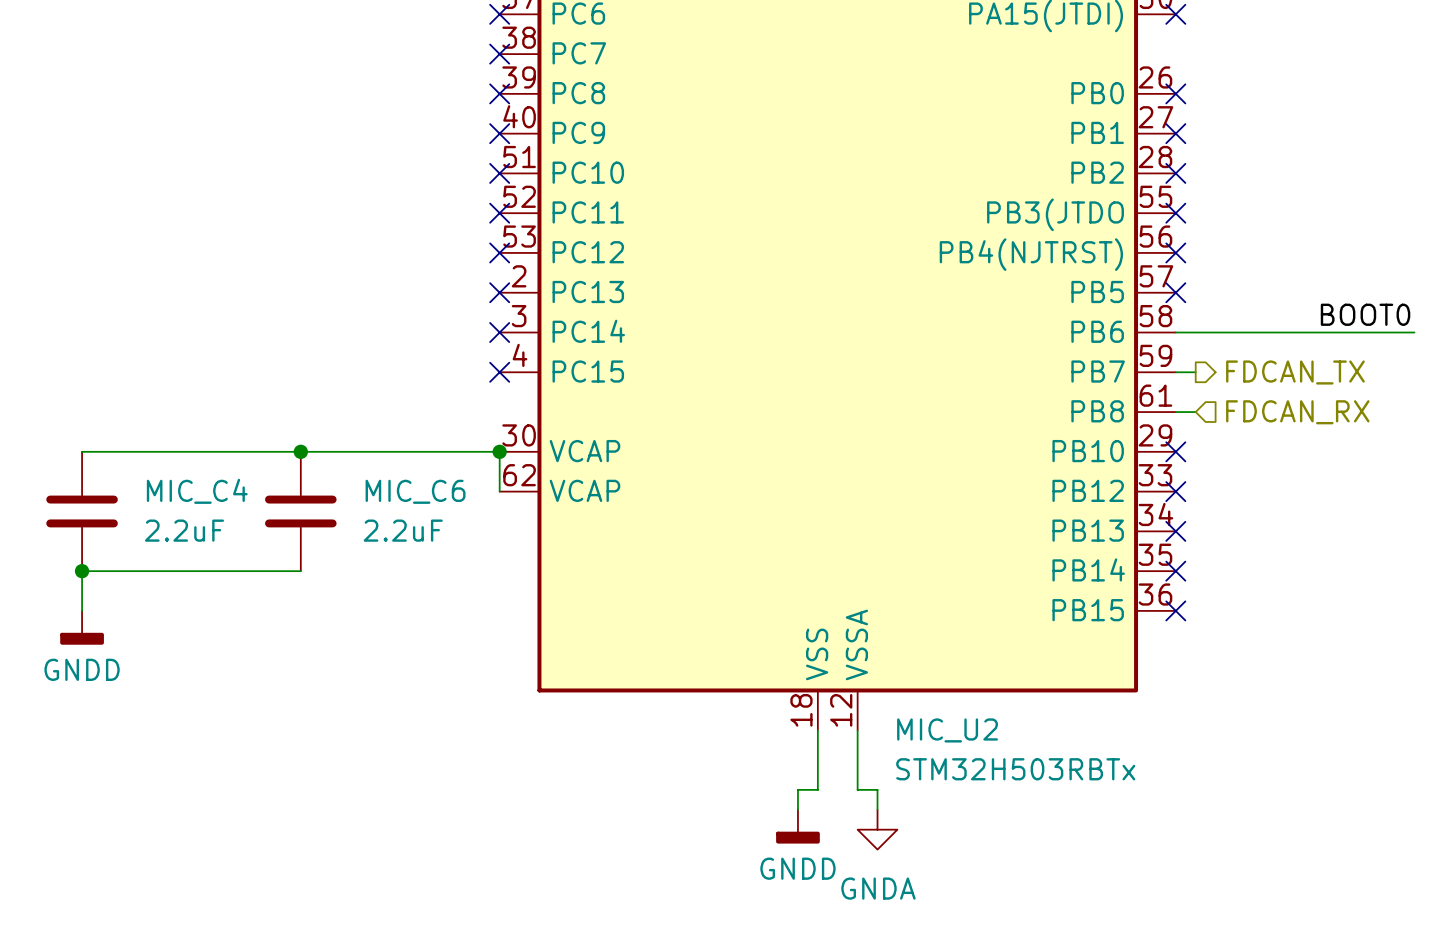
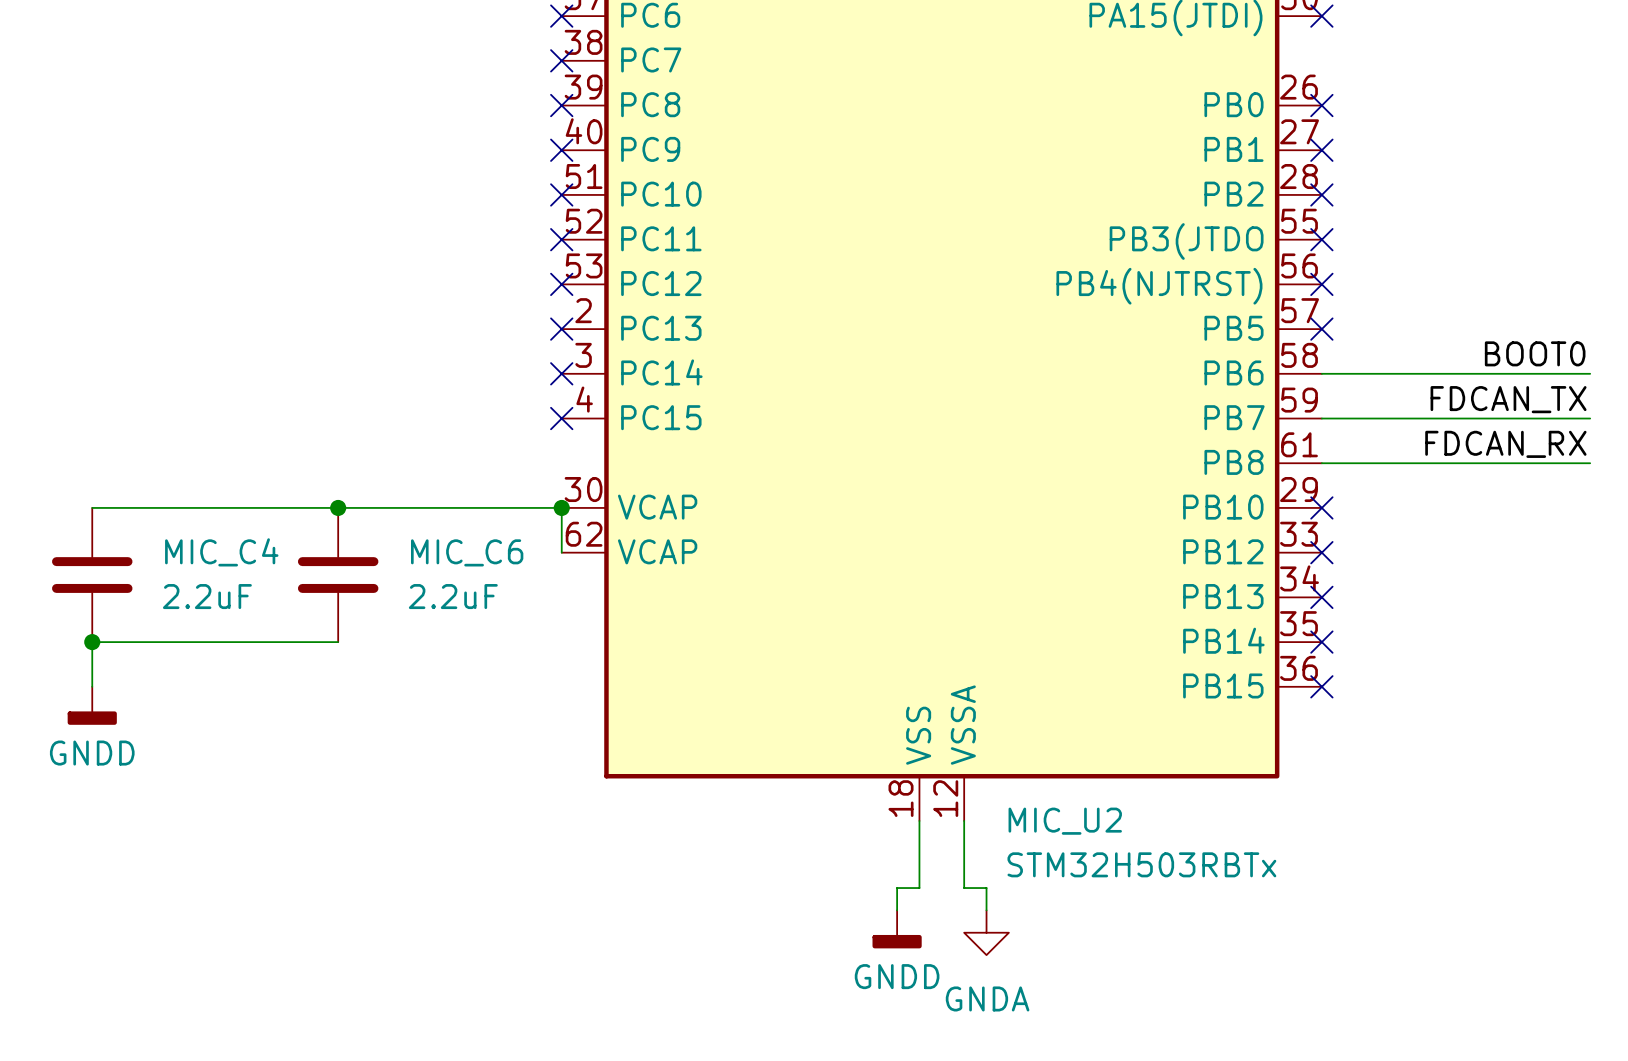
label: none -> FDCAN_TX (1508, 399)
wire: none -> (1344, 418) (1590, 418)
hierarchical label: FDCAN_TX (1295, 372) -> none
label: none -> FDCAN_RX (1505, 444)
wire: none -> (1344, 463) (1590, 463)
hierarchical label: FDCAN_RX (1297, 412) -> none

